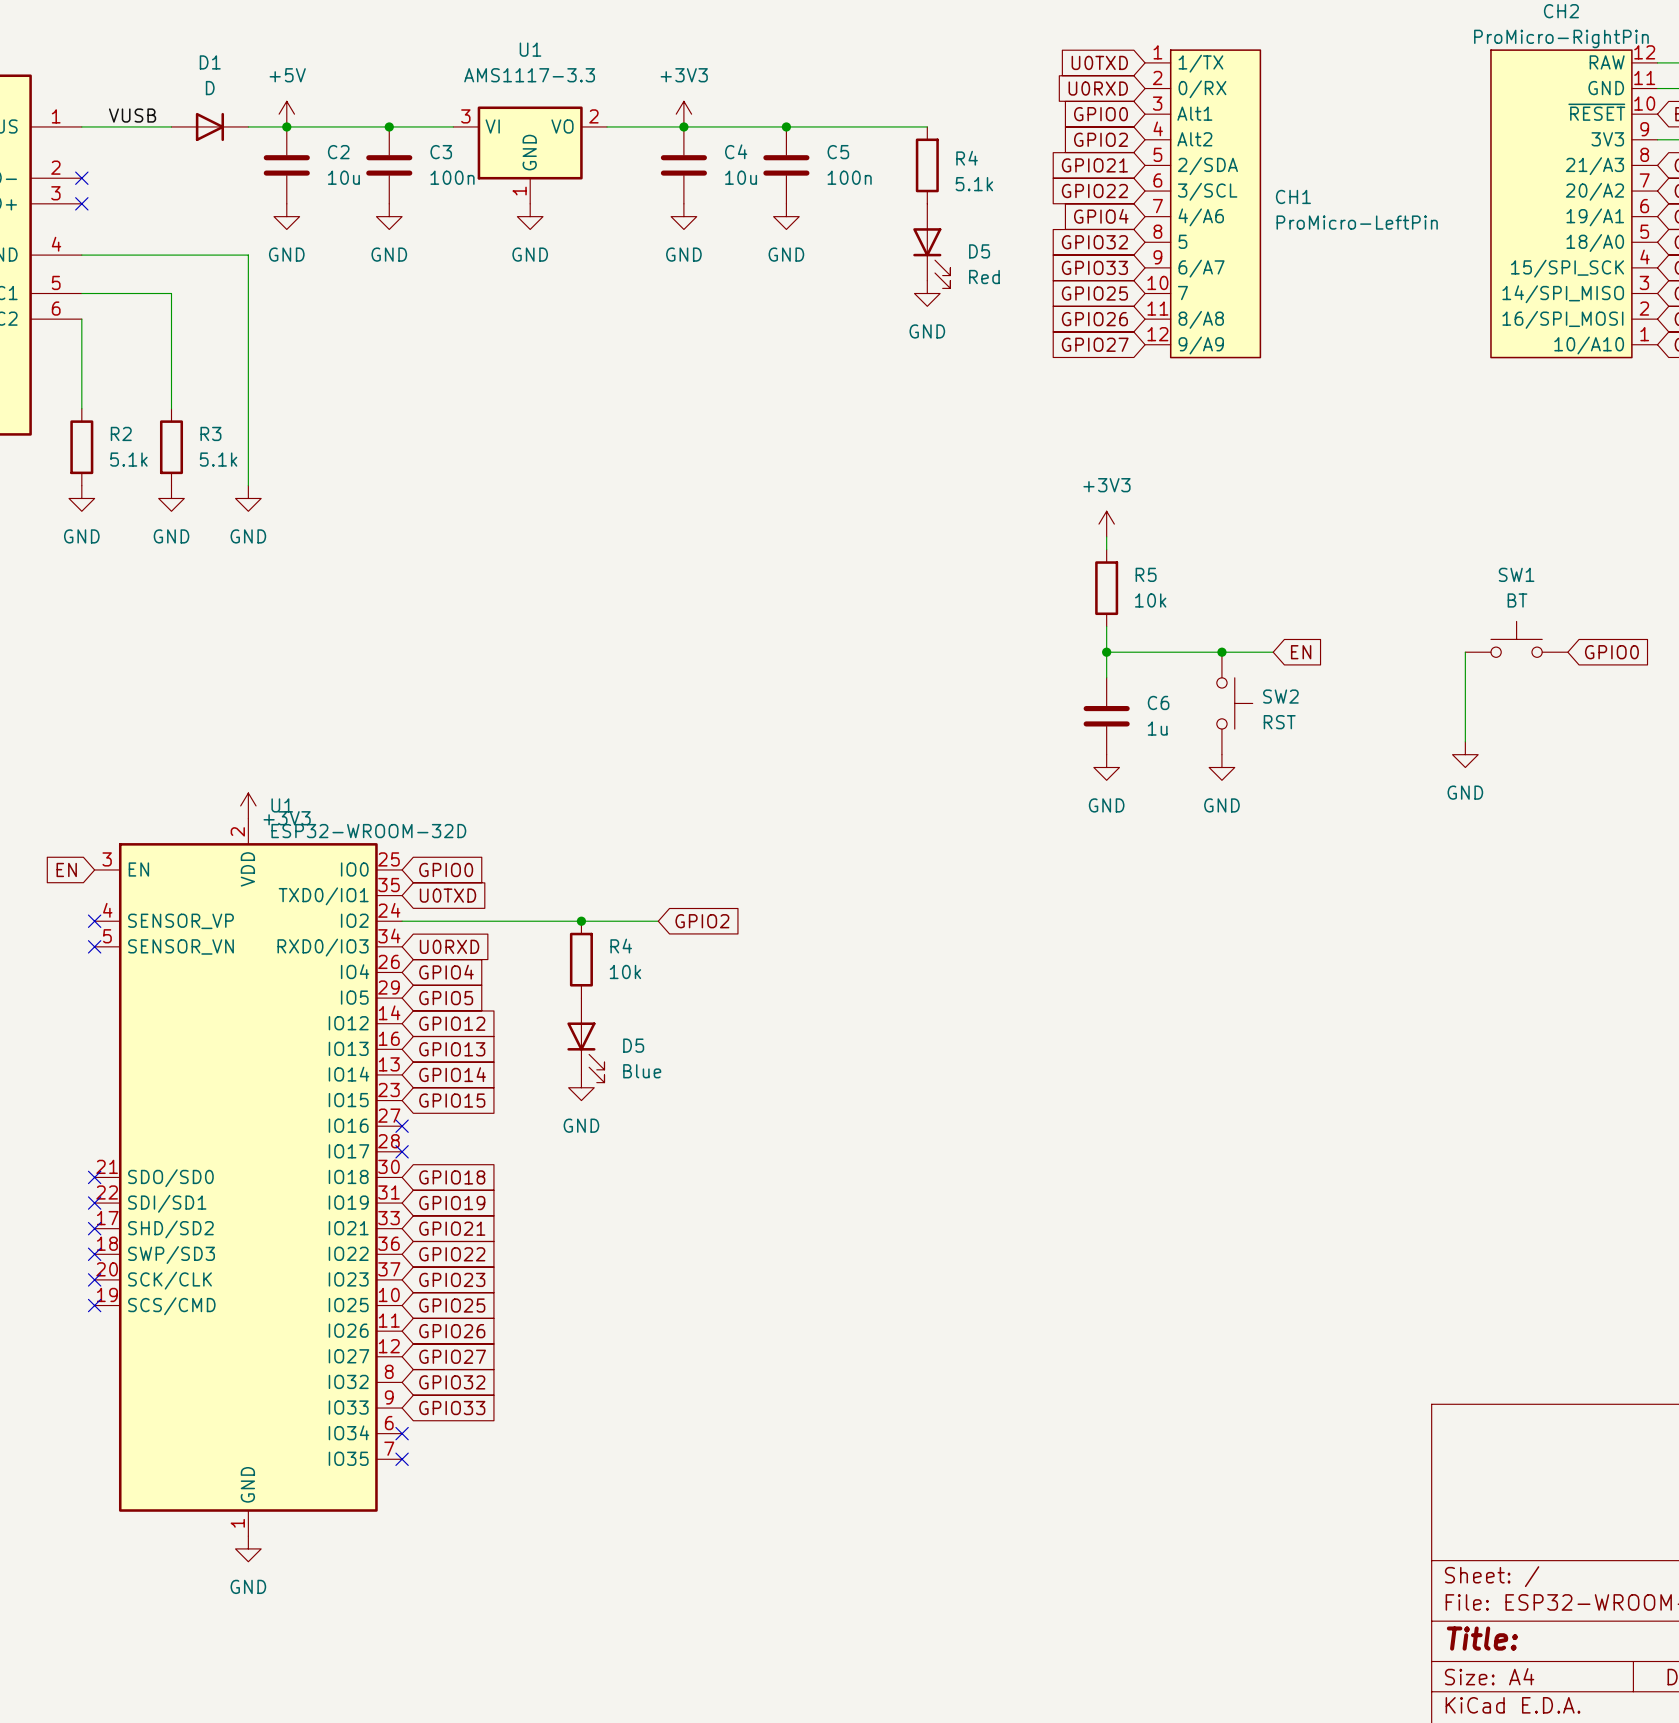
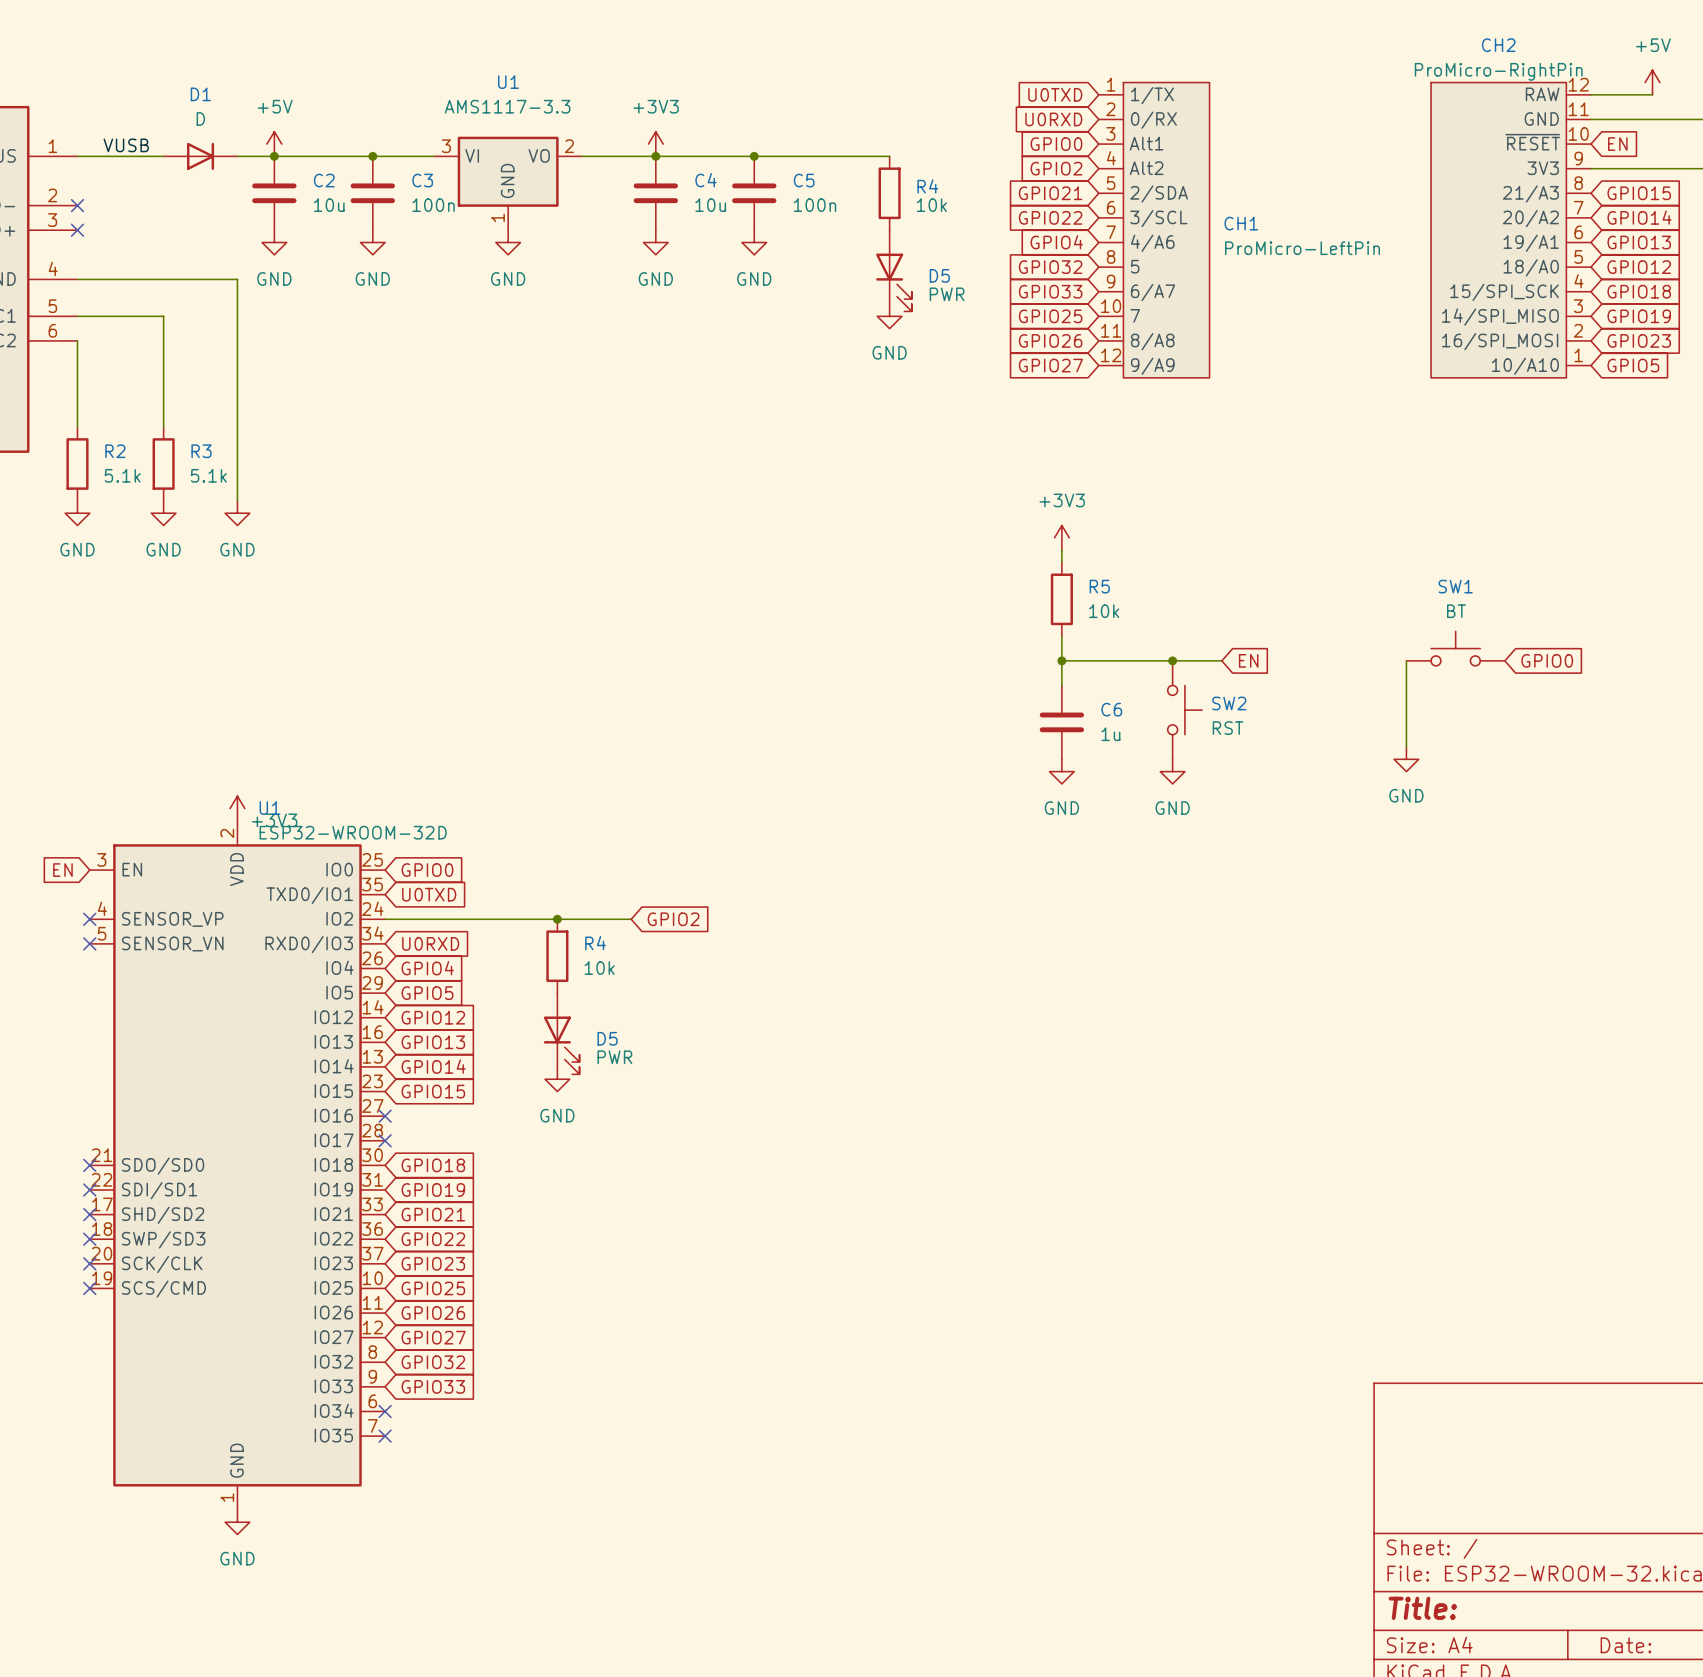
R4 value: 5.1k (974, 184) -> 10k (931, 205)
D5 value: Red (984, 277) -> PWR (947, 294)
D5 value: Blue (642, 1071) -> PWR (614, 1057)

